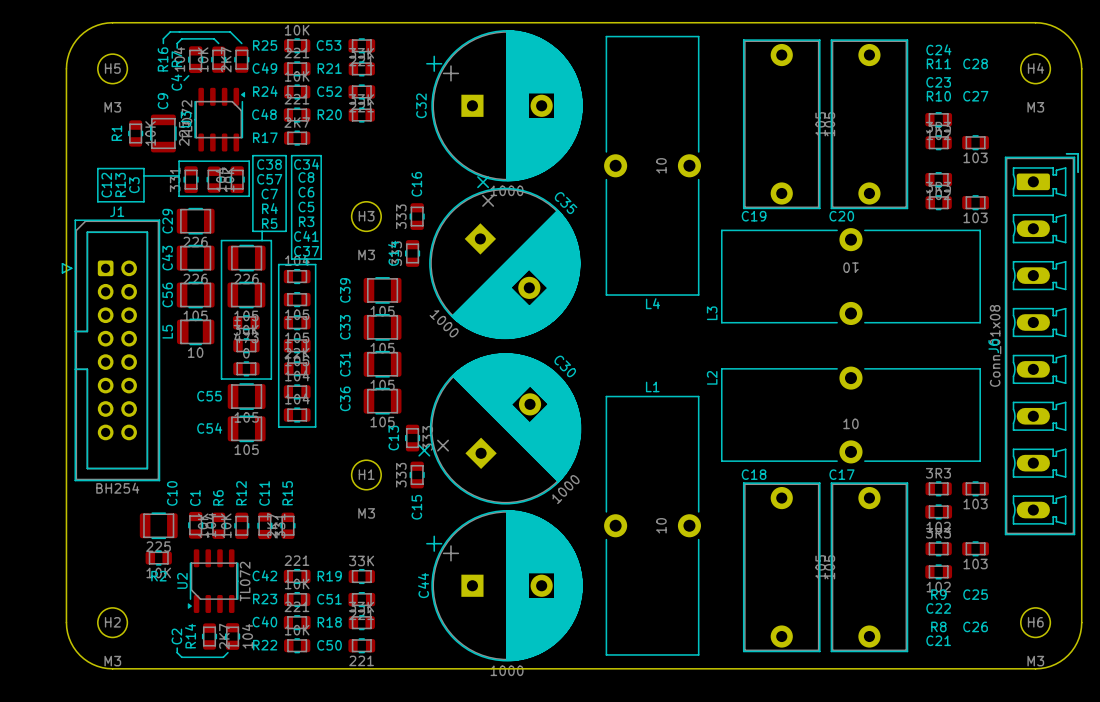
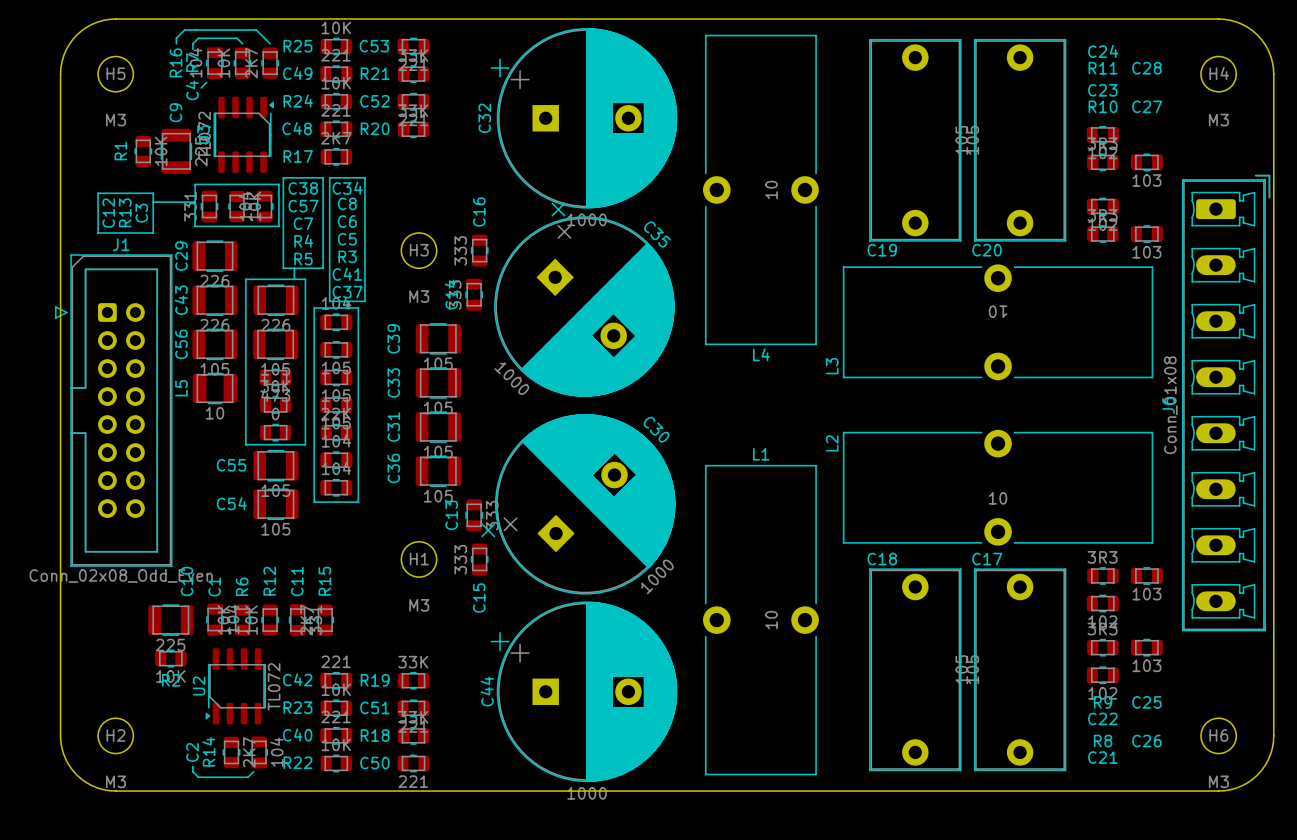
J1 value: BH254 (117, 488) -> Conn_02x08_Odd_Even (121, 575)

